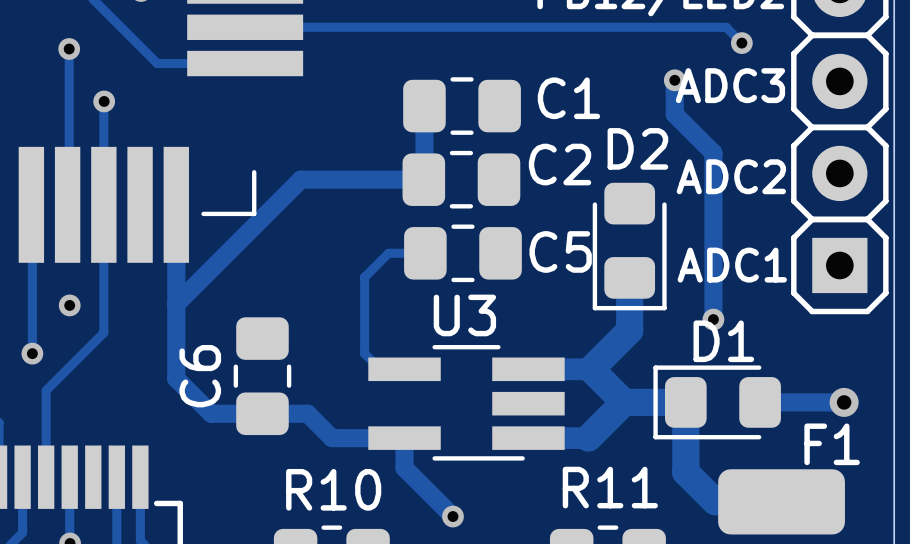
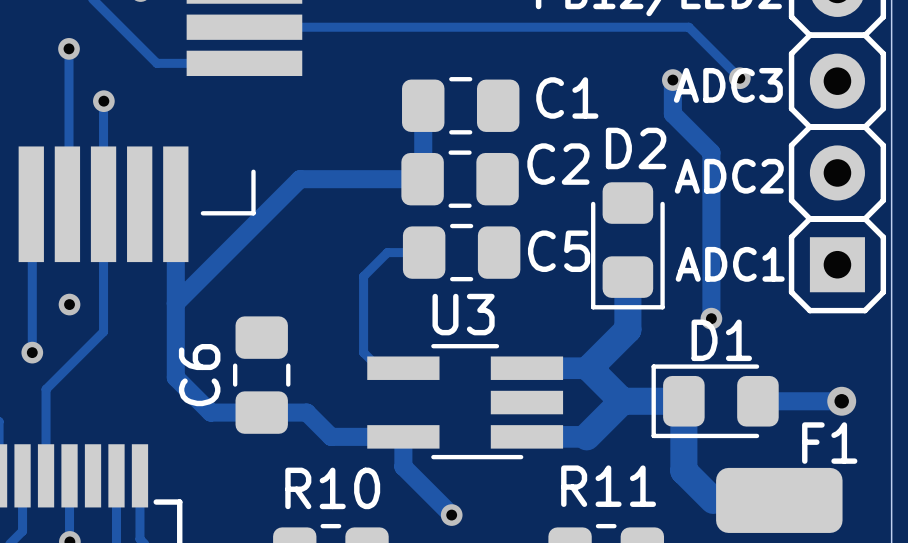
track: (690, 27) (726, 27) (741, 43) -> (688, 27) (739, 78)
via: (741, 43) -> none
via: none -> (739, 78)

